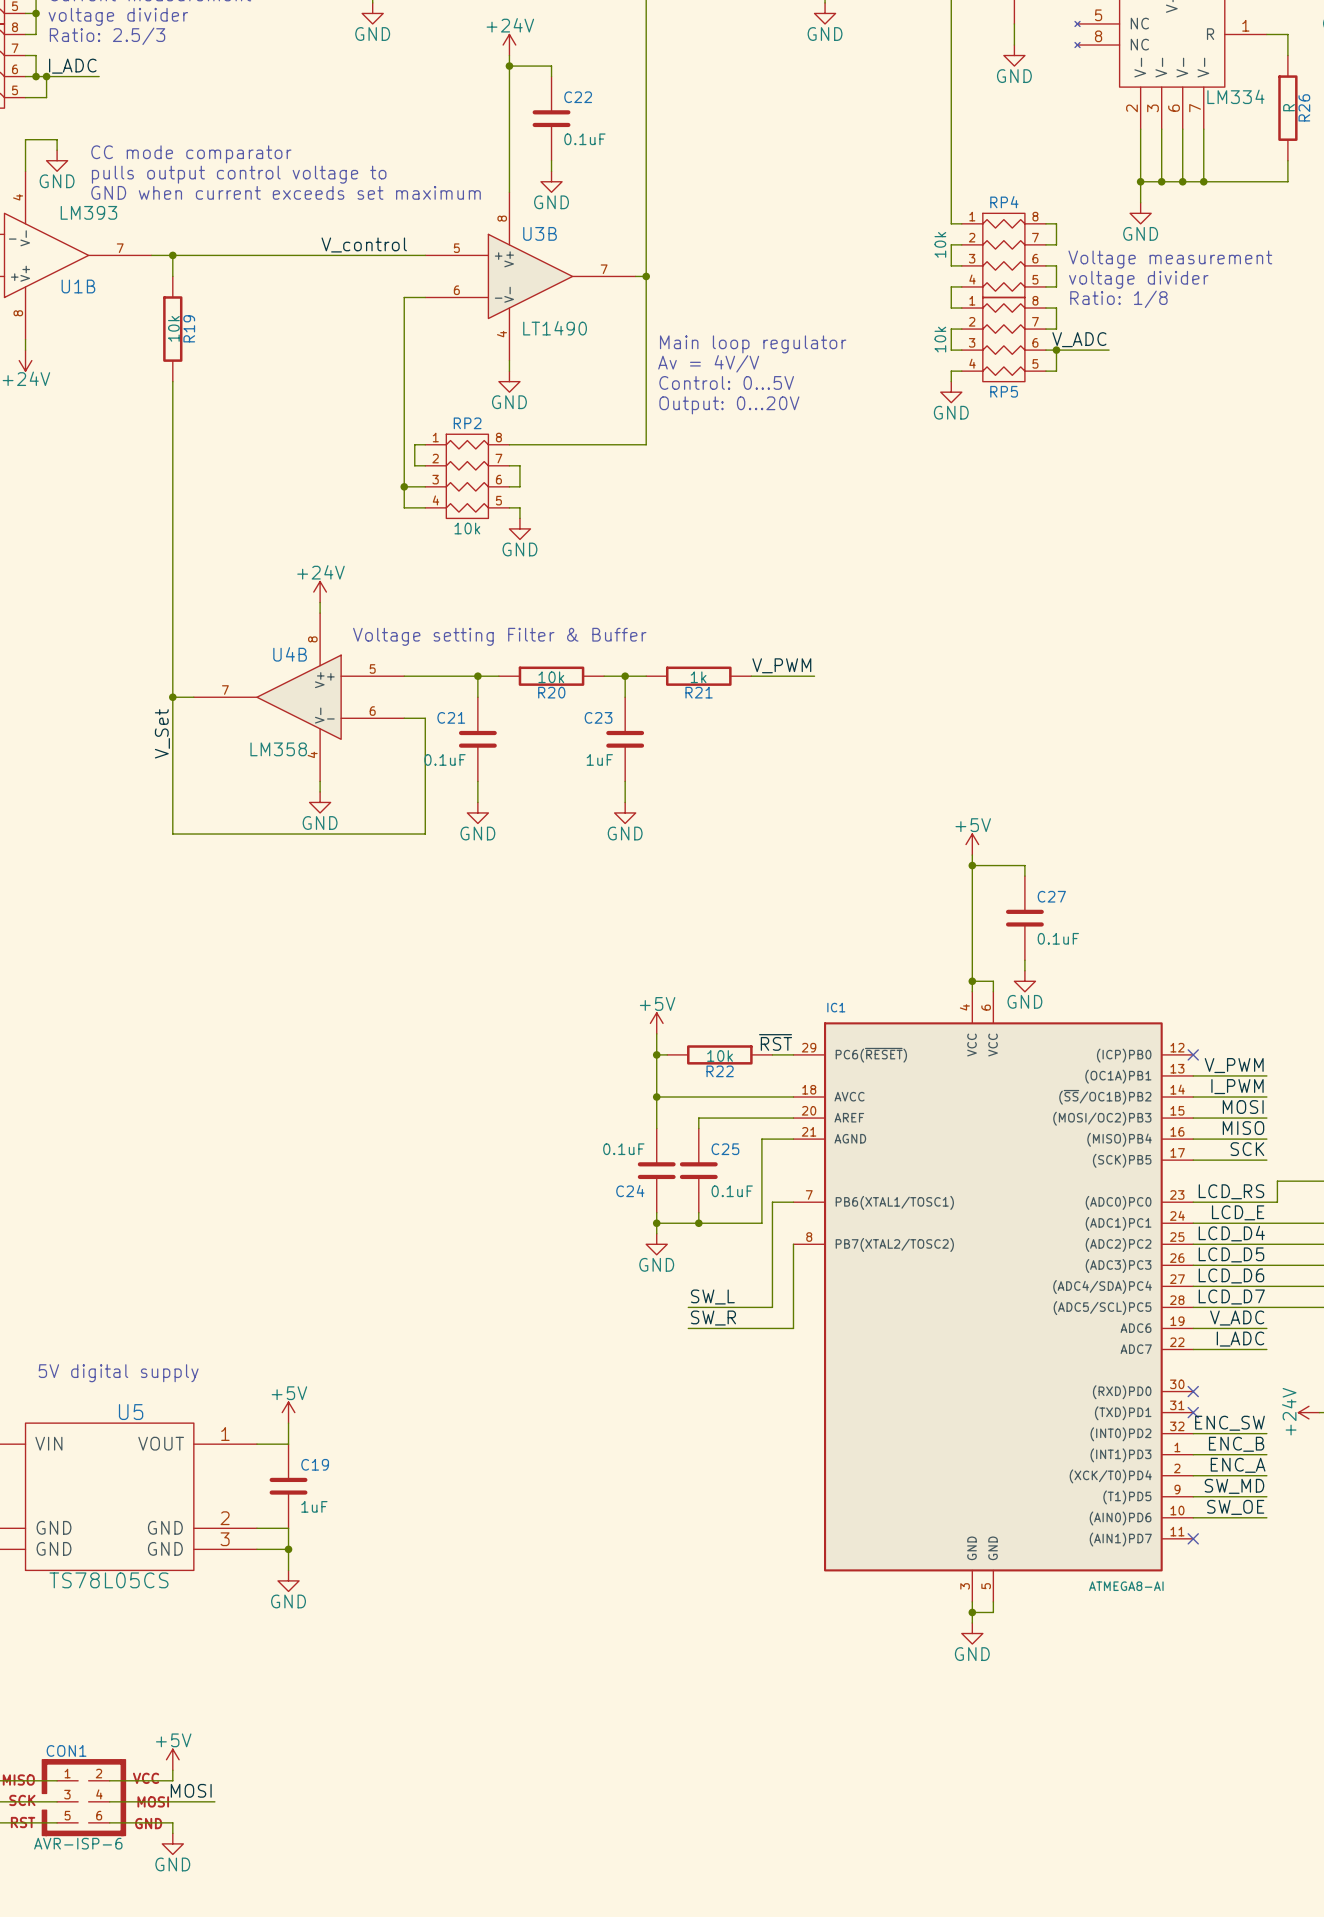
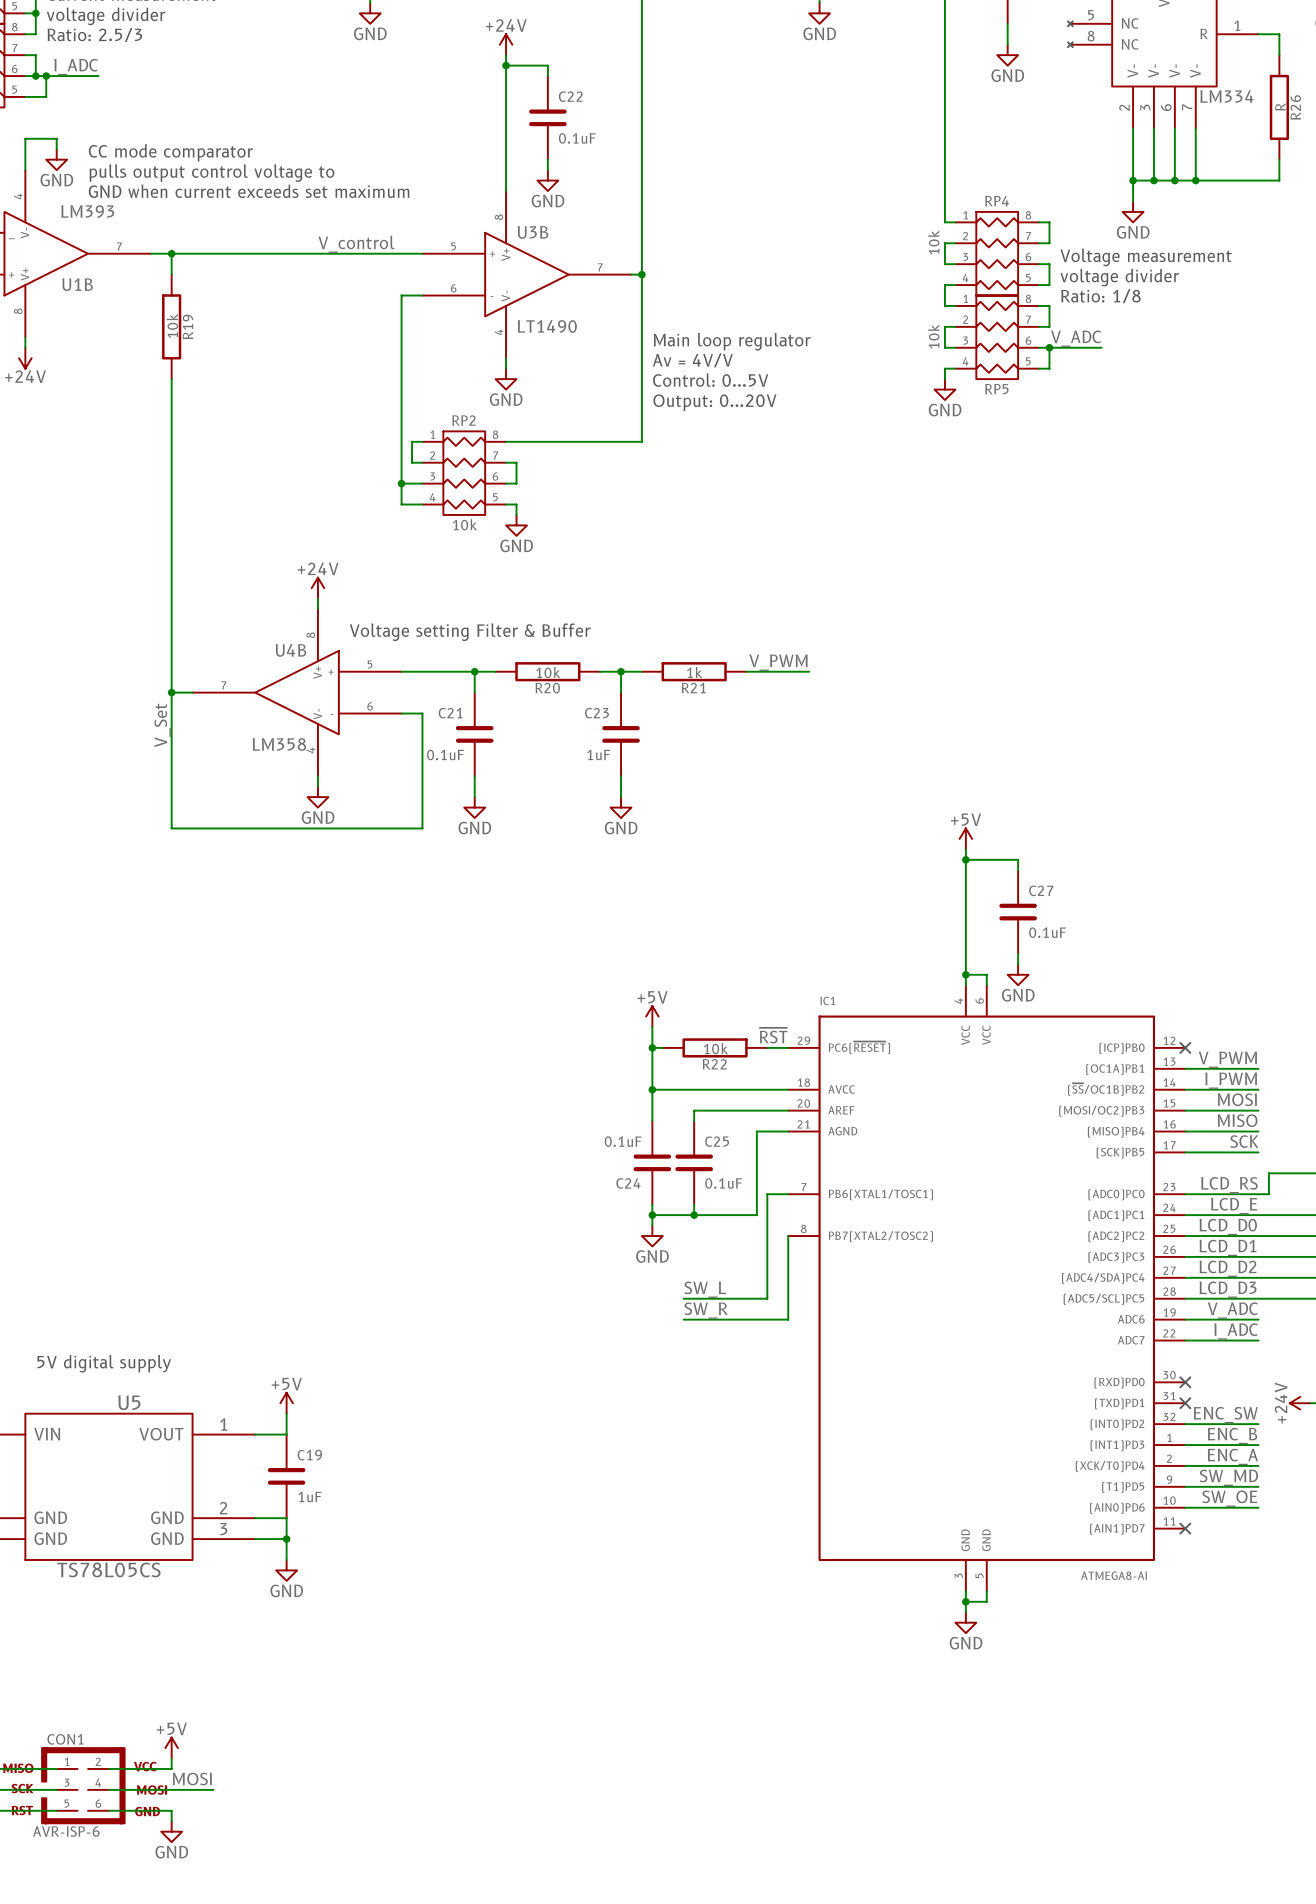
label: LCD_D4 (1231, 1233) -> LCD_D0 (1228, 1226)
label: LCD_D5 (1231, 1254) -> LCD_D1 (1227, 1247)
label: LCD_D6 (1231, 1275) -> LCD_D2 (1228, 1268)
label: LCD_D7 (1231, 1296) -> LCD_D3 (1228, 1289)

